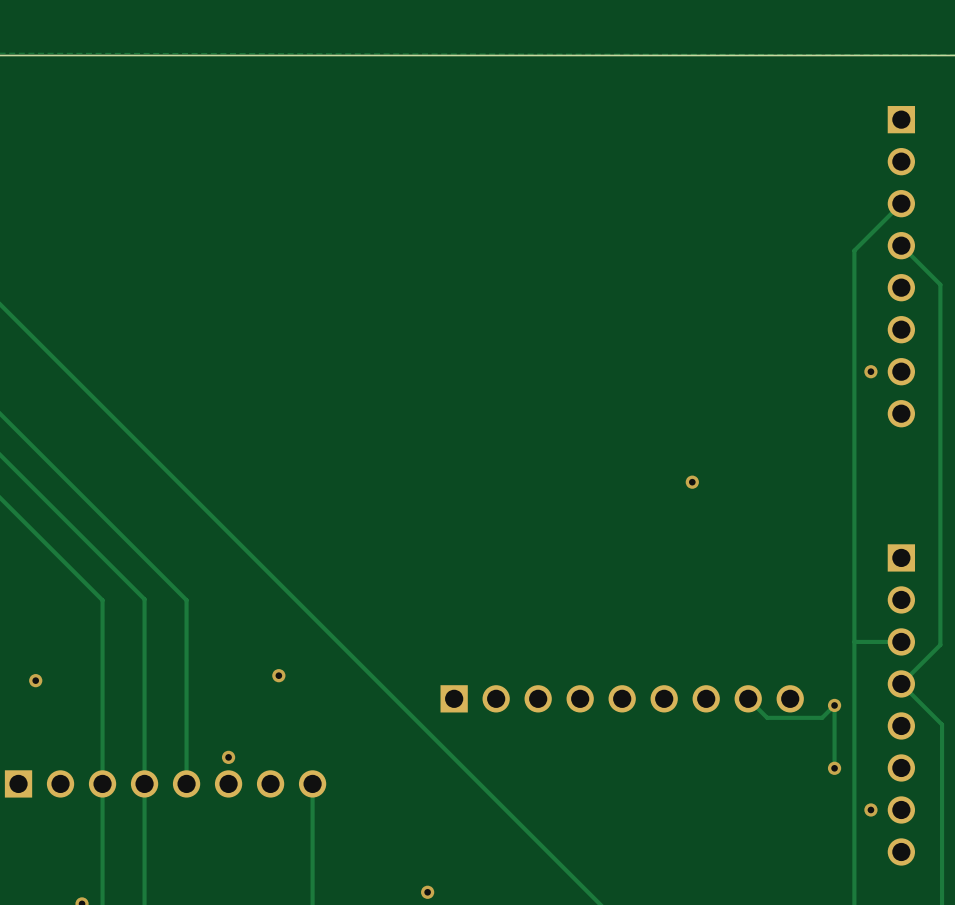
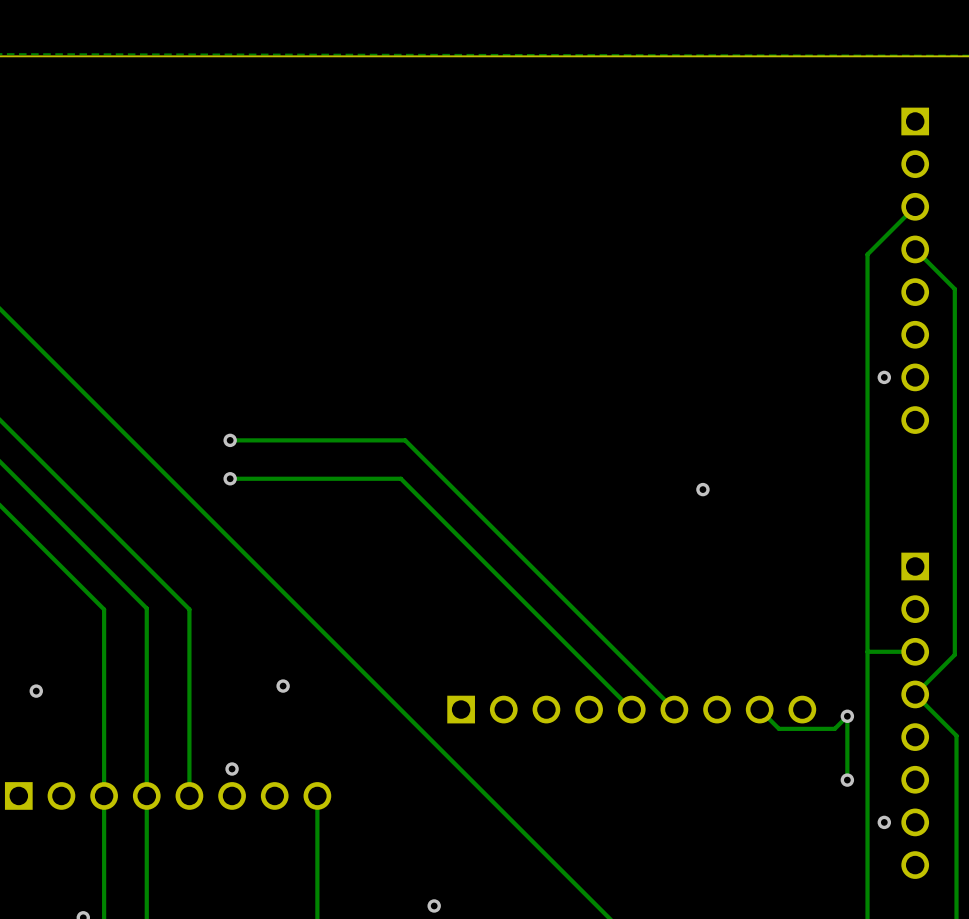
track: none -> (230, 440) (405, 440) (674, 709)
via: none -> (230, 440)
track: none -> (230, 478) (400, 478) (631, 709)
via: none -> (230, 478)

